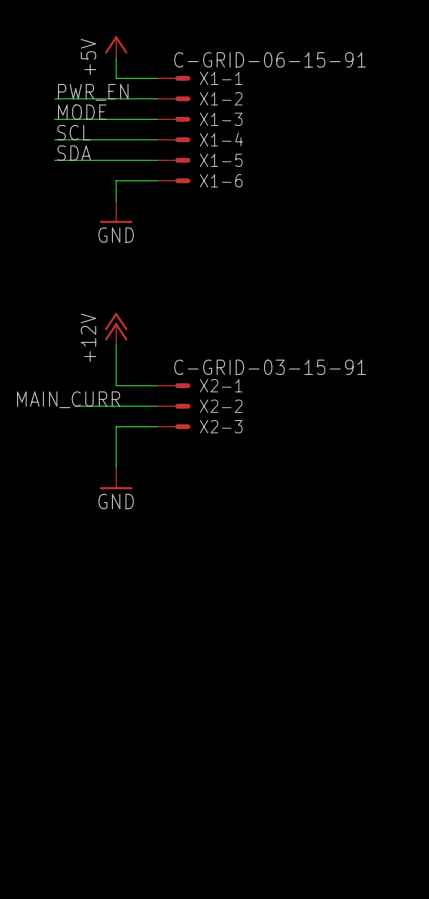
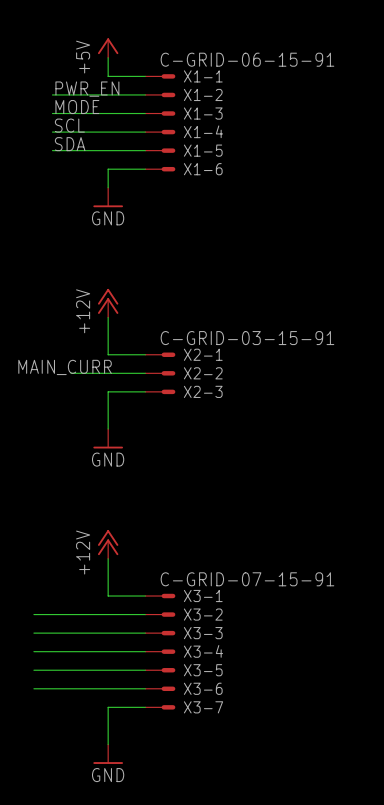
power symbol: none -> +12V (108, 544)
wire: none -> (108, 558) (108, 596) (145, 596)
X3-1: none -> C-GRID-07-15-91 (160, 596)
wire: none -> (33, 614) (145, 614)
X3-2: none -> (160, 614)
wire: none -> (33, 633) (145, 633)
X3-3: none -> (160, 633)
wire: none -> (33, 651) (145, 651)
X3-4: none -> (160, 651)
wire: none -> (33, 670) (145, 670)
X3-5: none -> (160, 670)
wire: none -> (33, 688) (145, 688)
X3-6: none -> (160, 688)
wire: none -> (145, 707) (108, 707) (108, 744)
X3-7: none -> (160, 707)
power symbol: none -> GND (108, 754)

